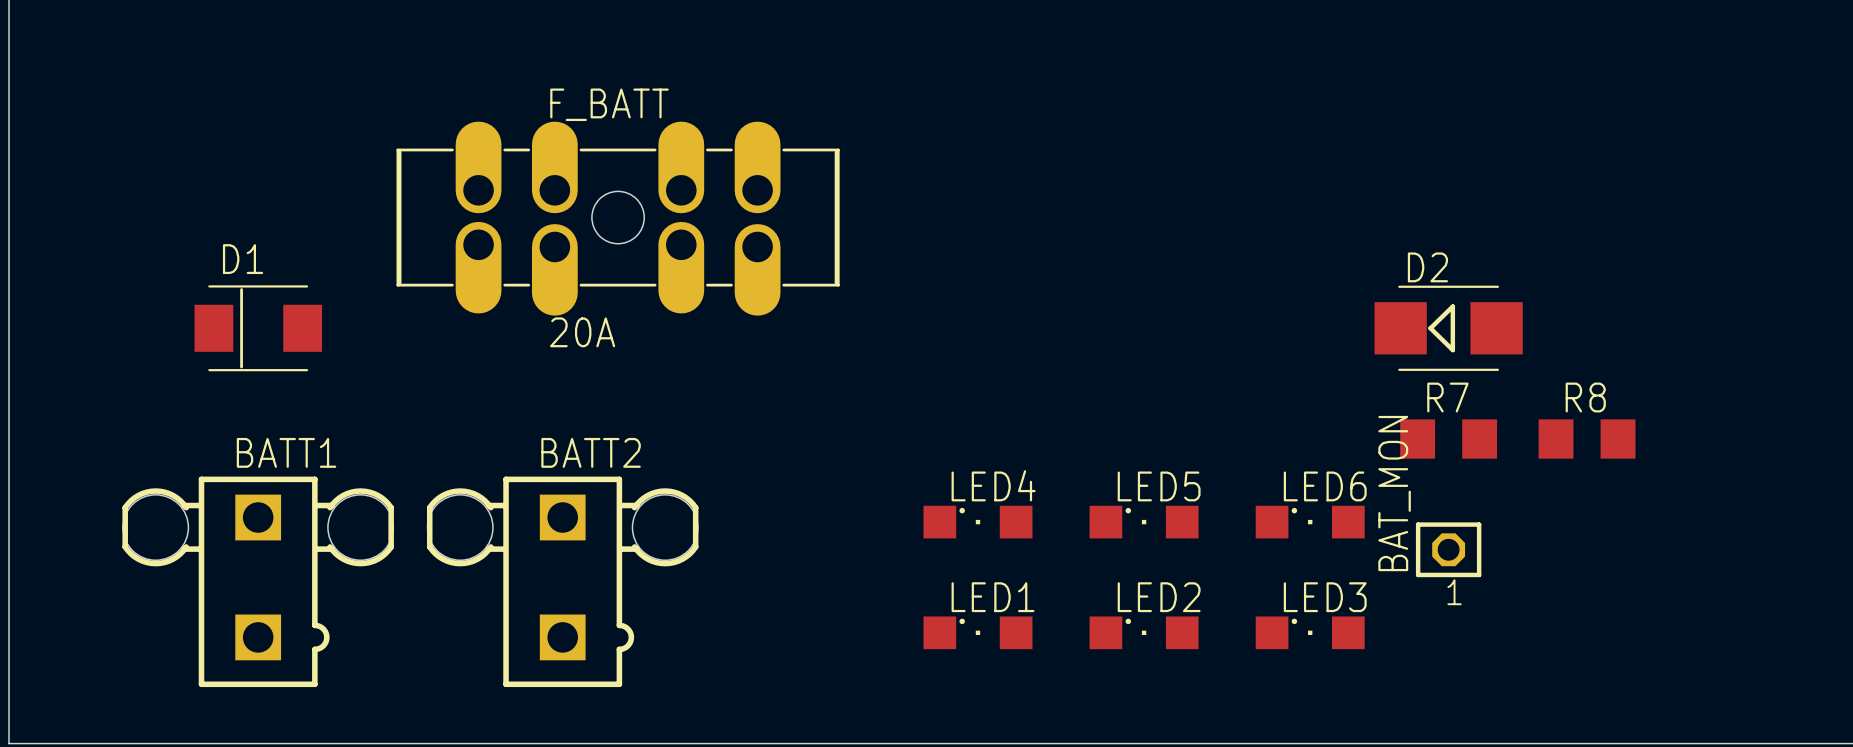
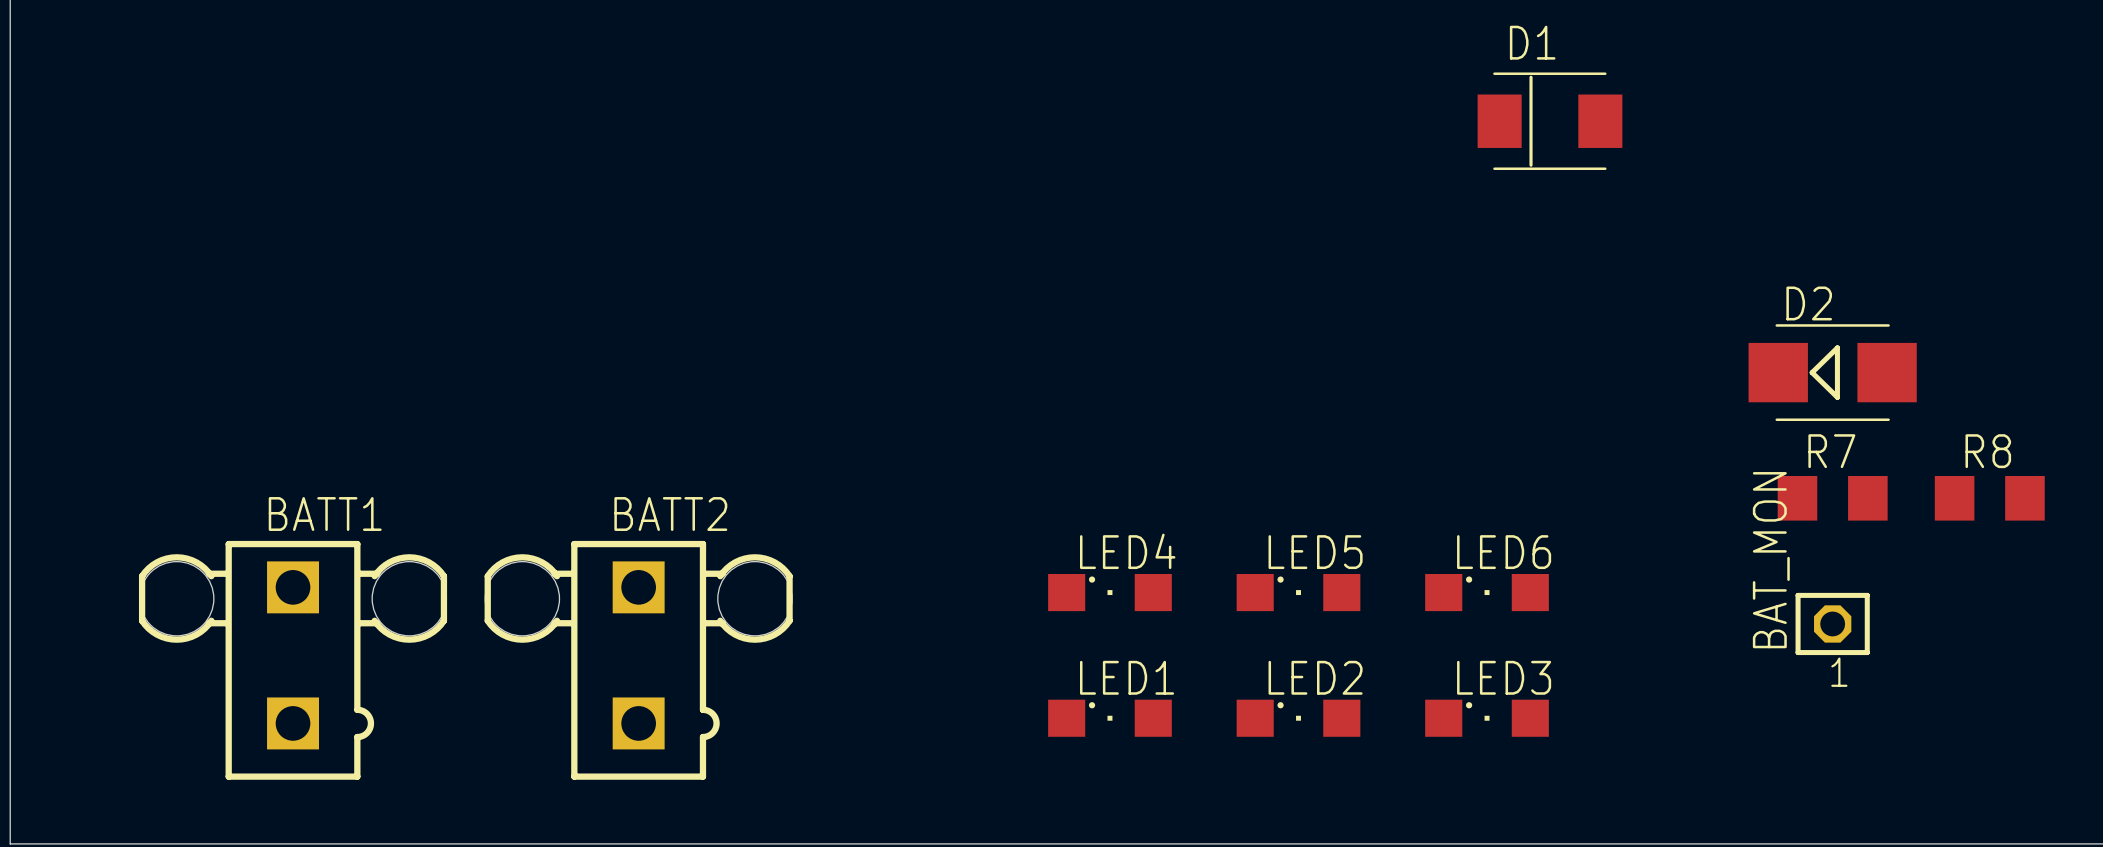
F_BATT: 20A (618, 218) -> none
D1 position: (258, 328) -> (1550, 121)
D2 position: (1448, 328) -> (1832, 372)
R7 position: (1448, 439) -> (1832, 498)
R8 position: (1587, 439) -> (1989, 498)
BAT_MON position: (1448, 549) -> (1832, 623)

